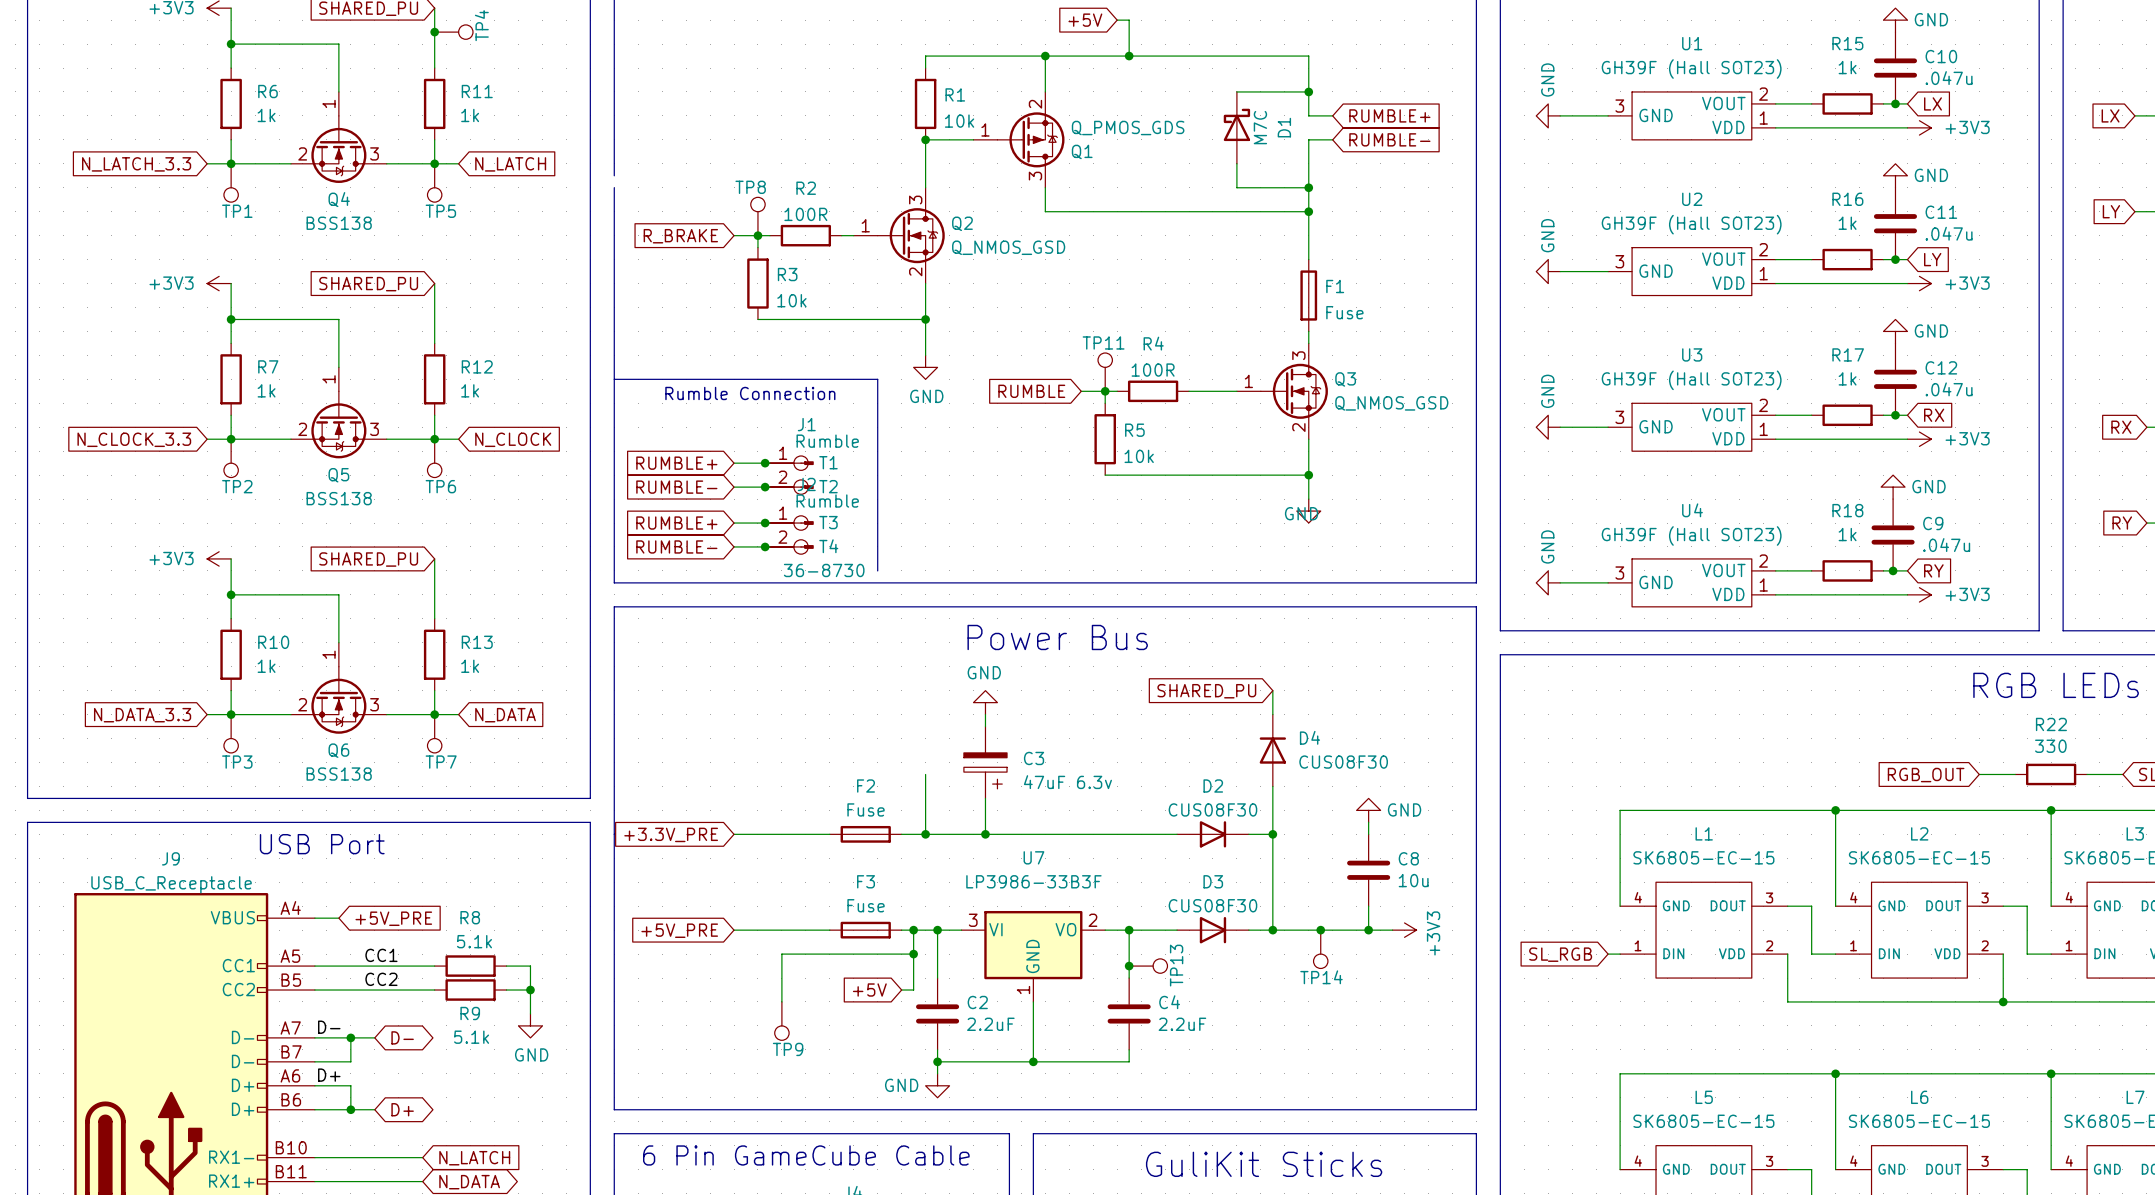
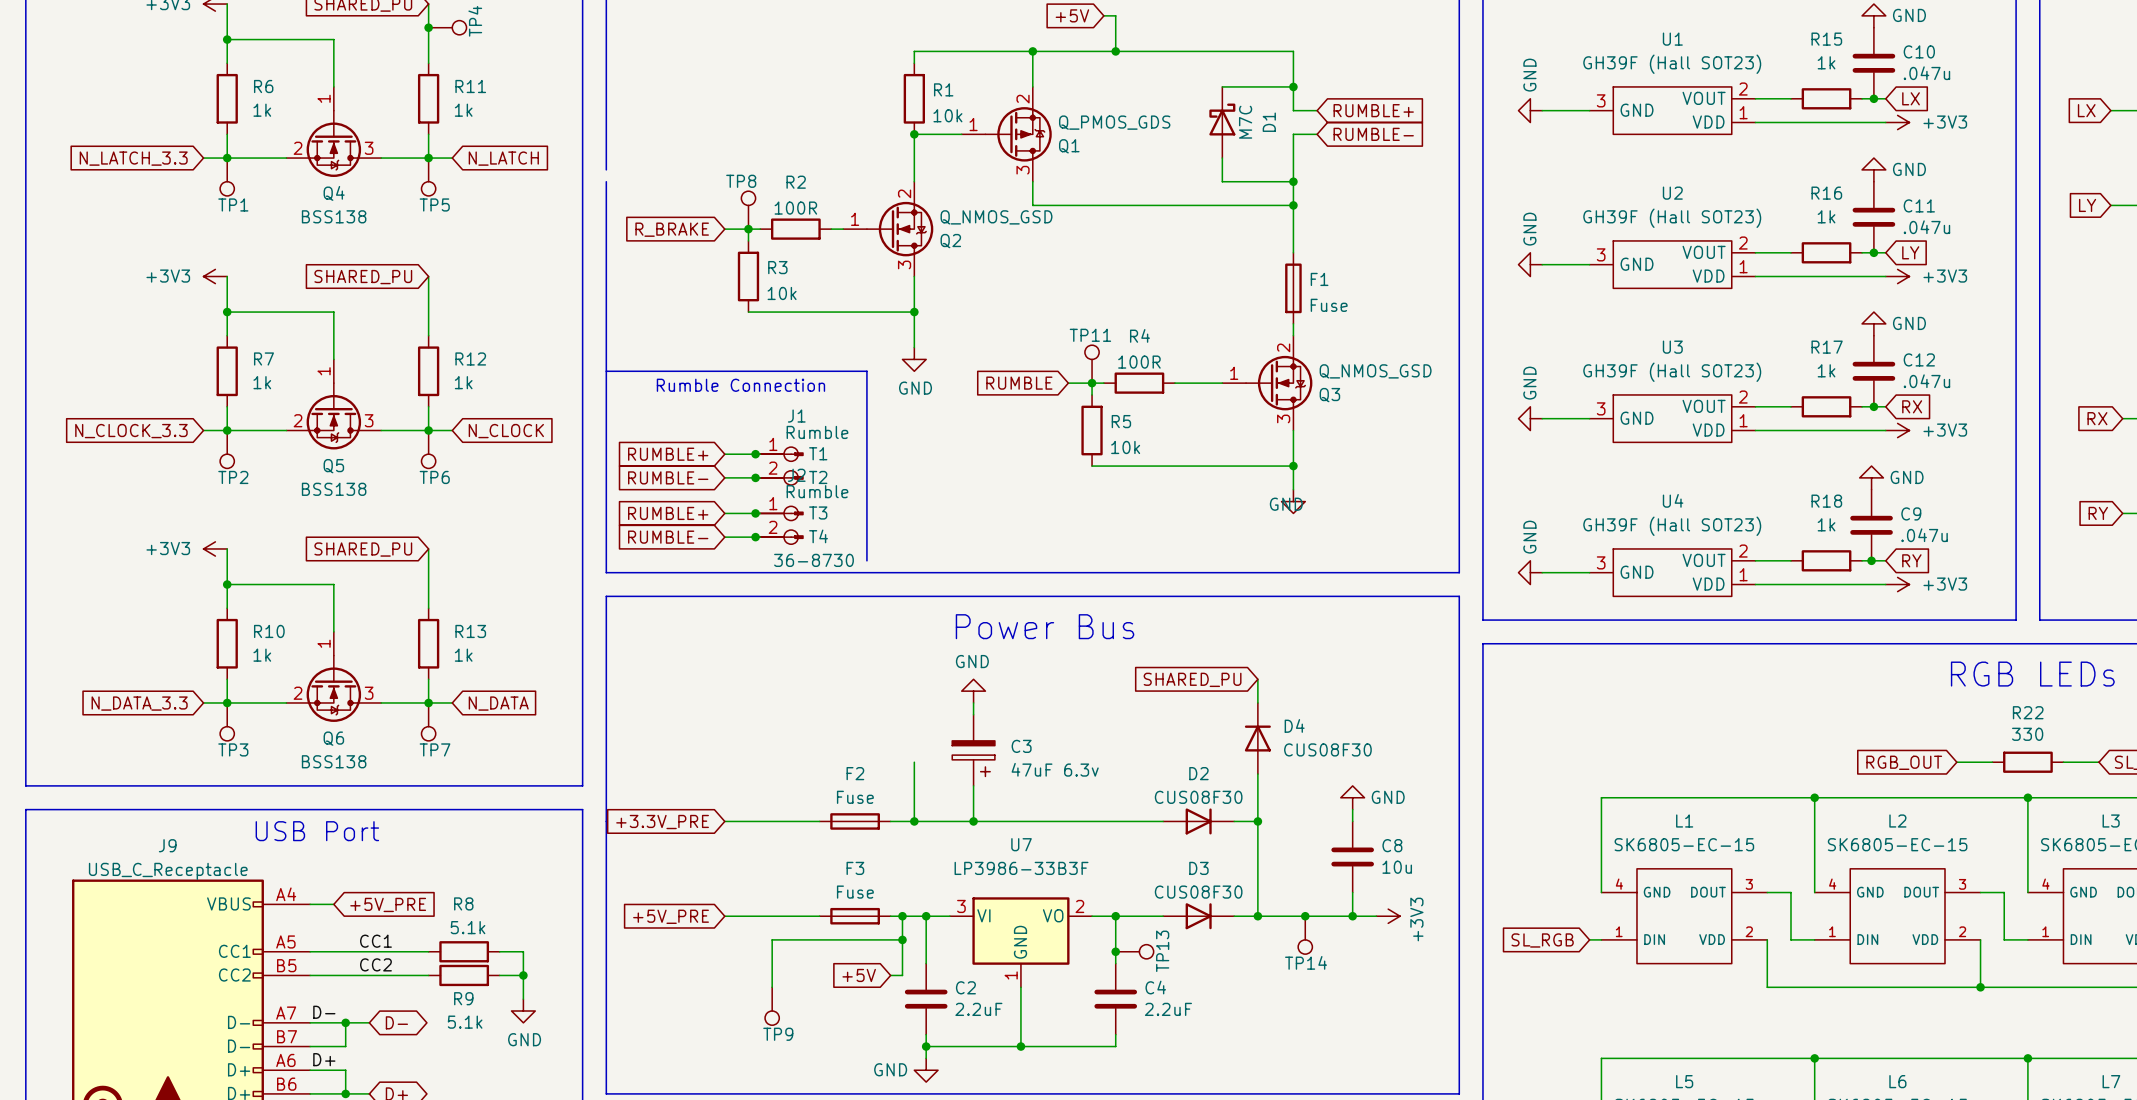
Q2 flip: as is (911, 235) -> up-down (900, 229)
Q3 flip: as is (1294, 391) -> up-down (1279, 383)

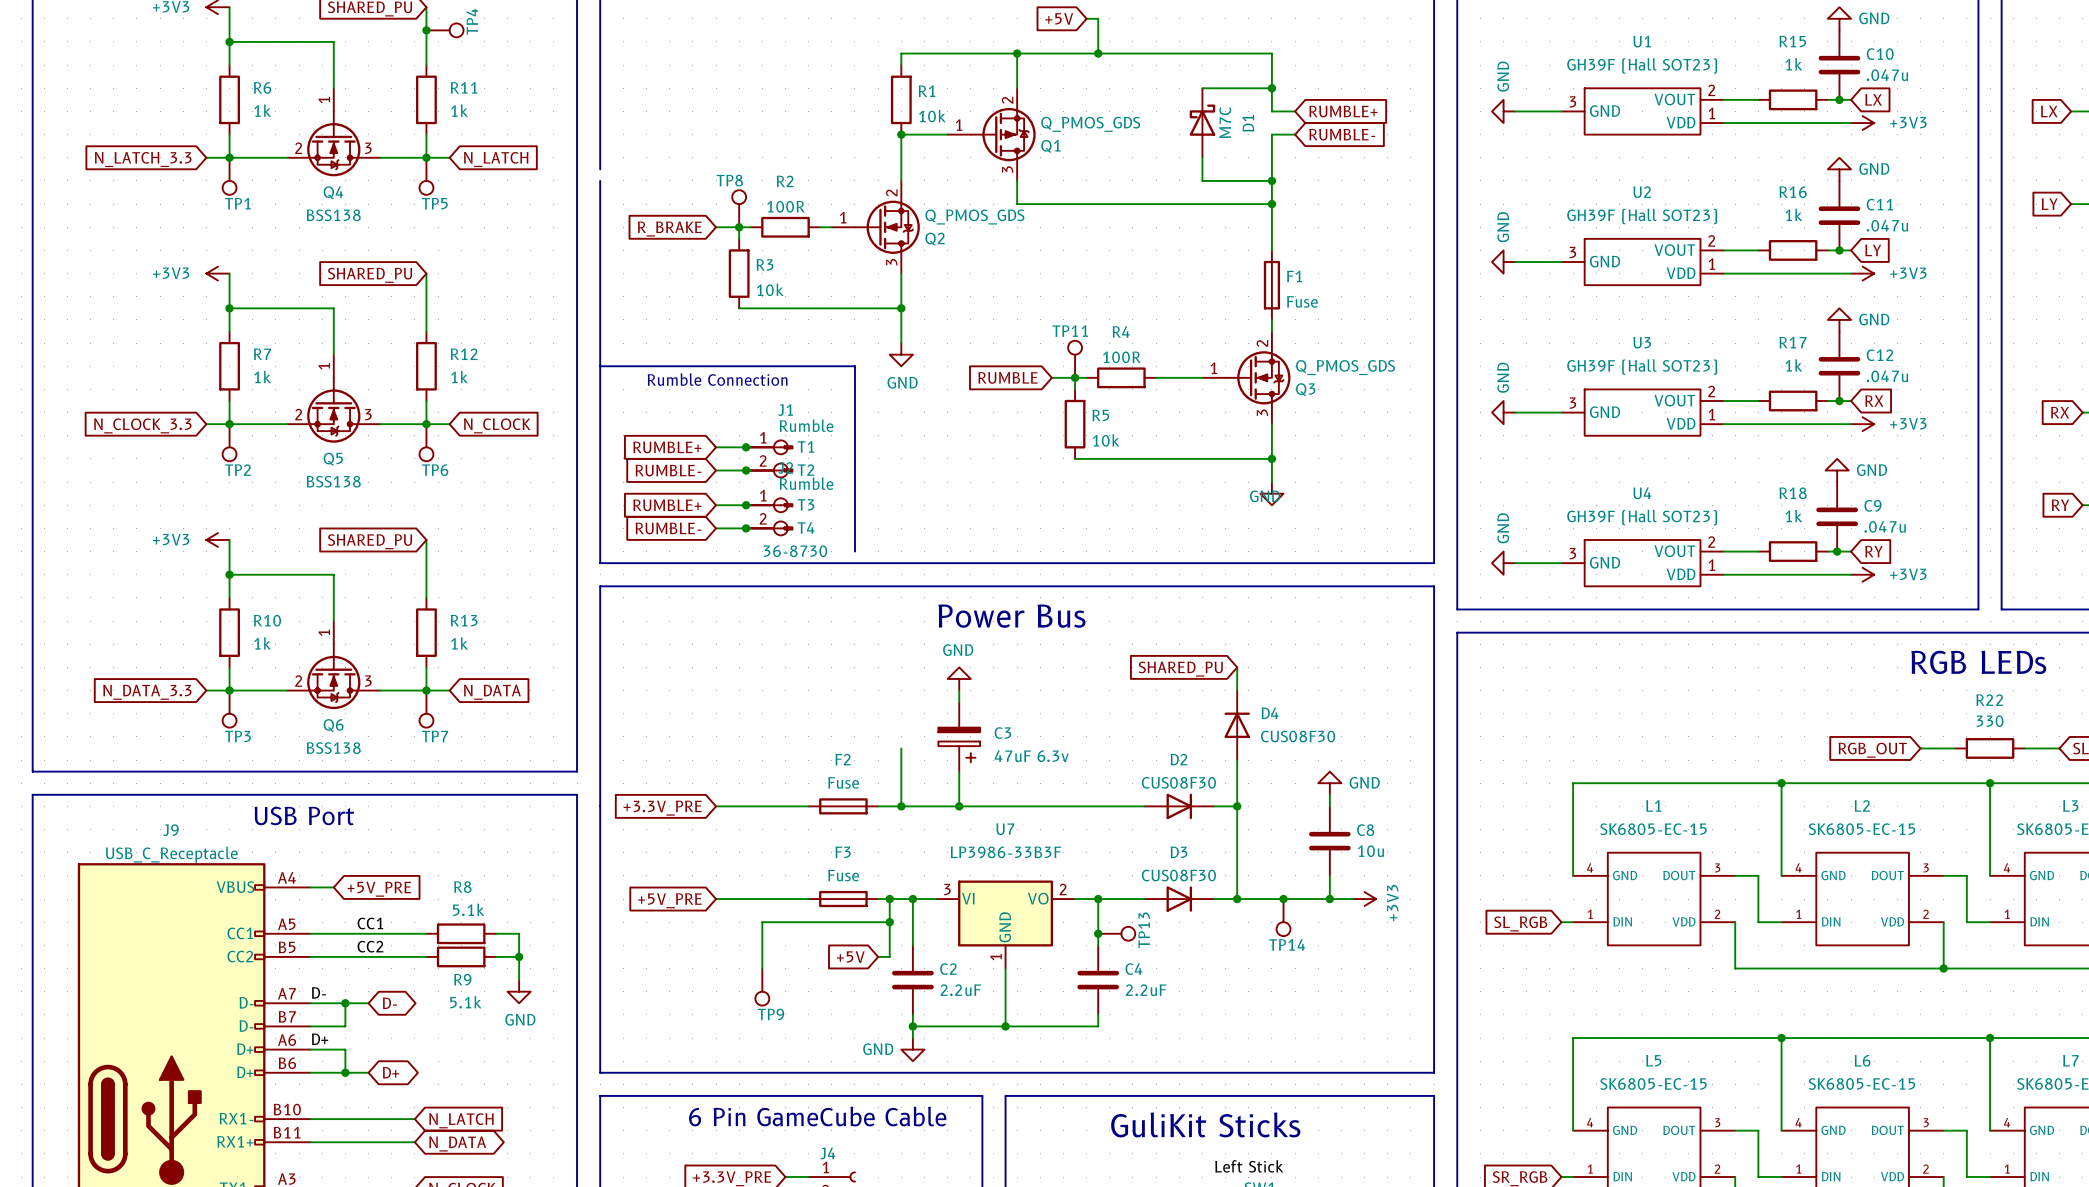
Q2 value: Q_NMOS_GSD (996, 217) -> Q_PMOS_GDS (974, 216)
Q3 value: Q_NMOS_GSD (1375, 371) -> Q_PMOS_GDS (1345, 367)

